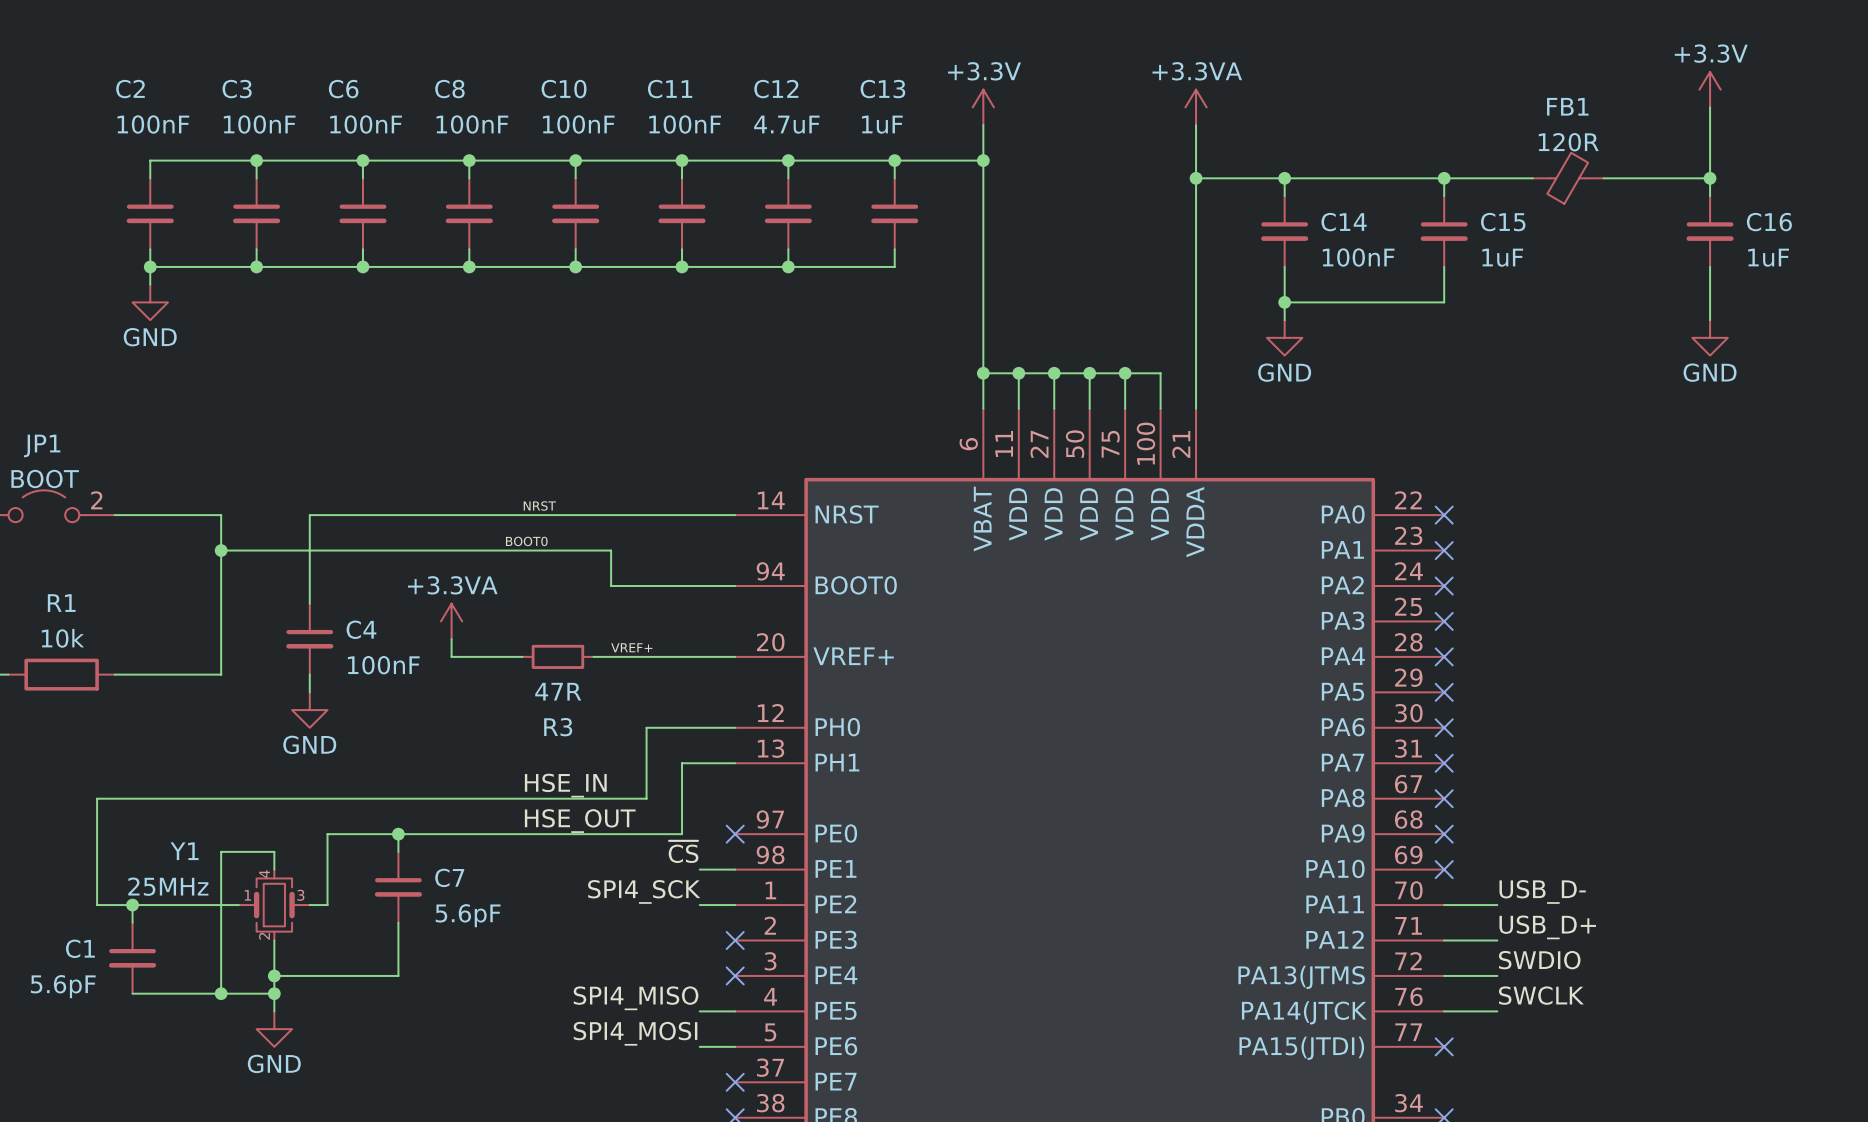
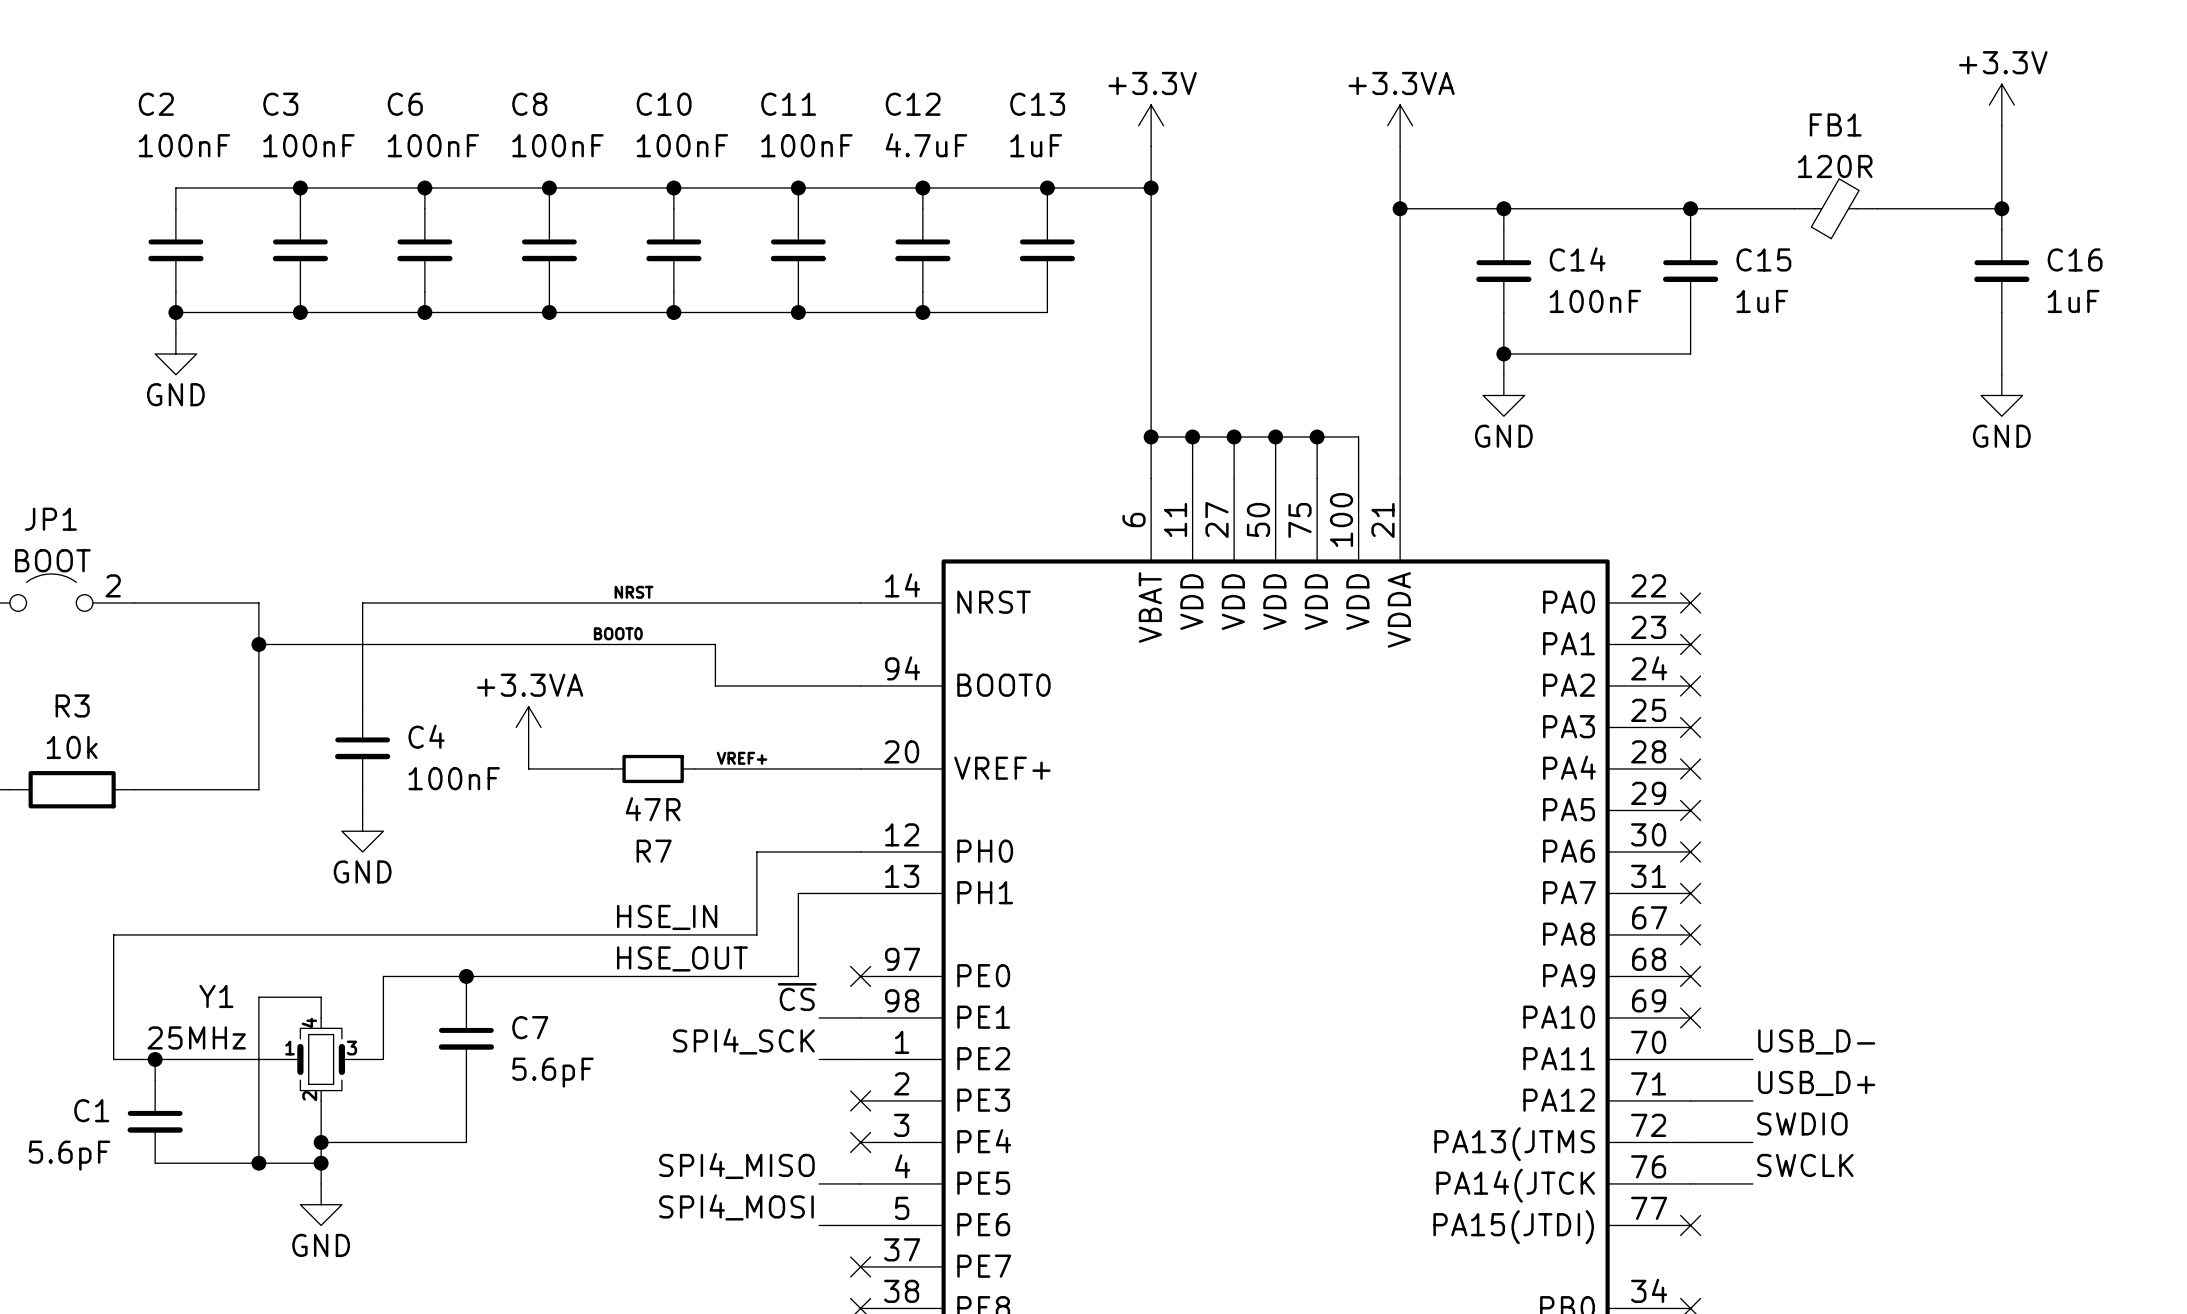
R1 name: R1 (61, 603) -> R3 (72, 705)
R3 name: R3 (558, 727) -> R7 (654, 851)

